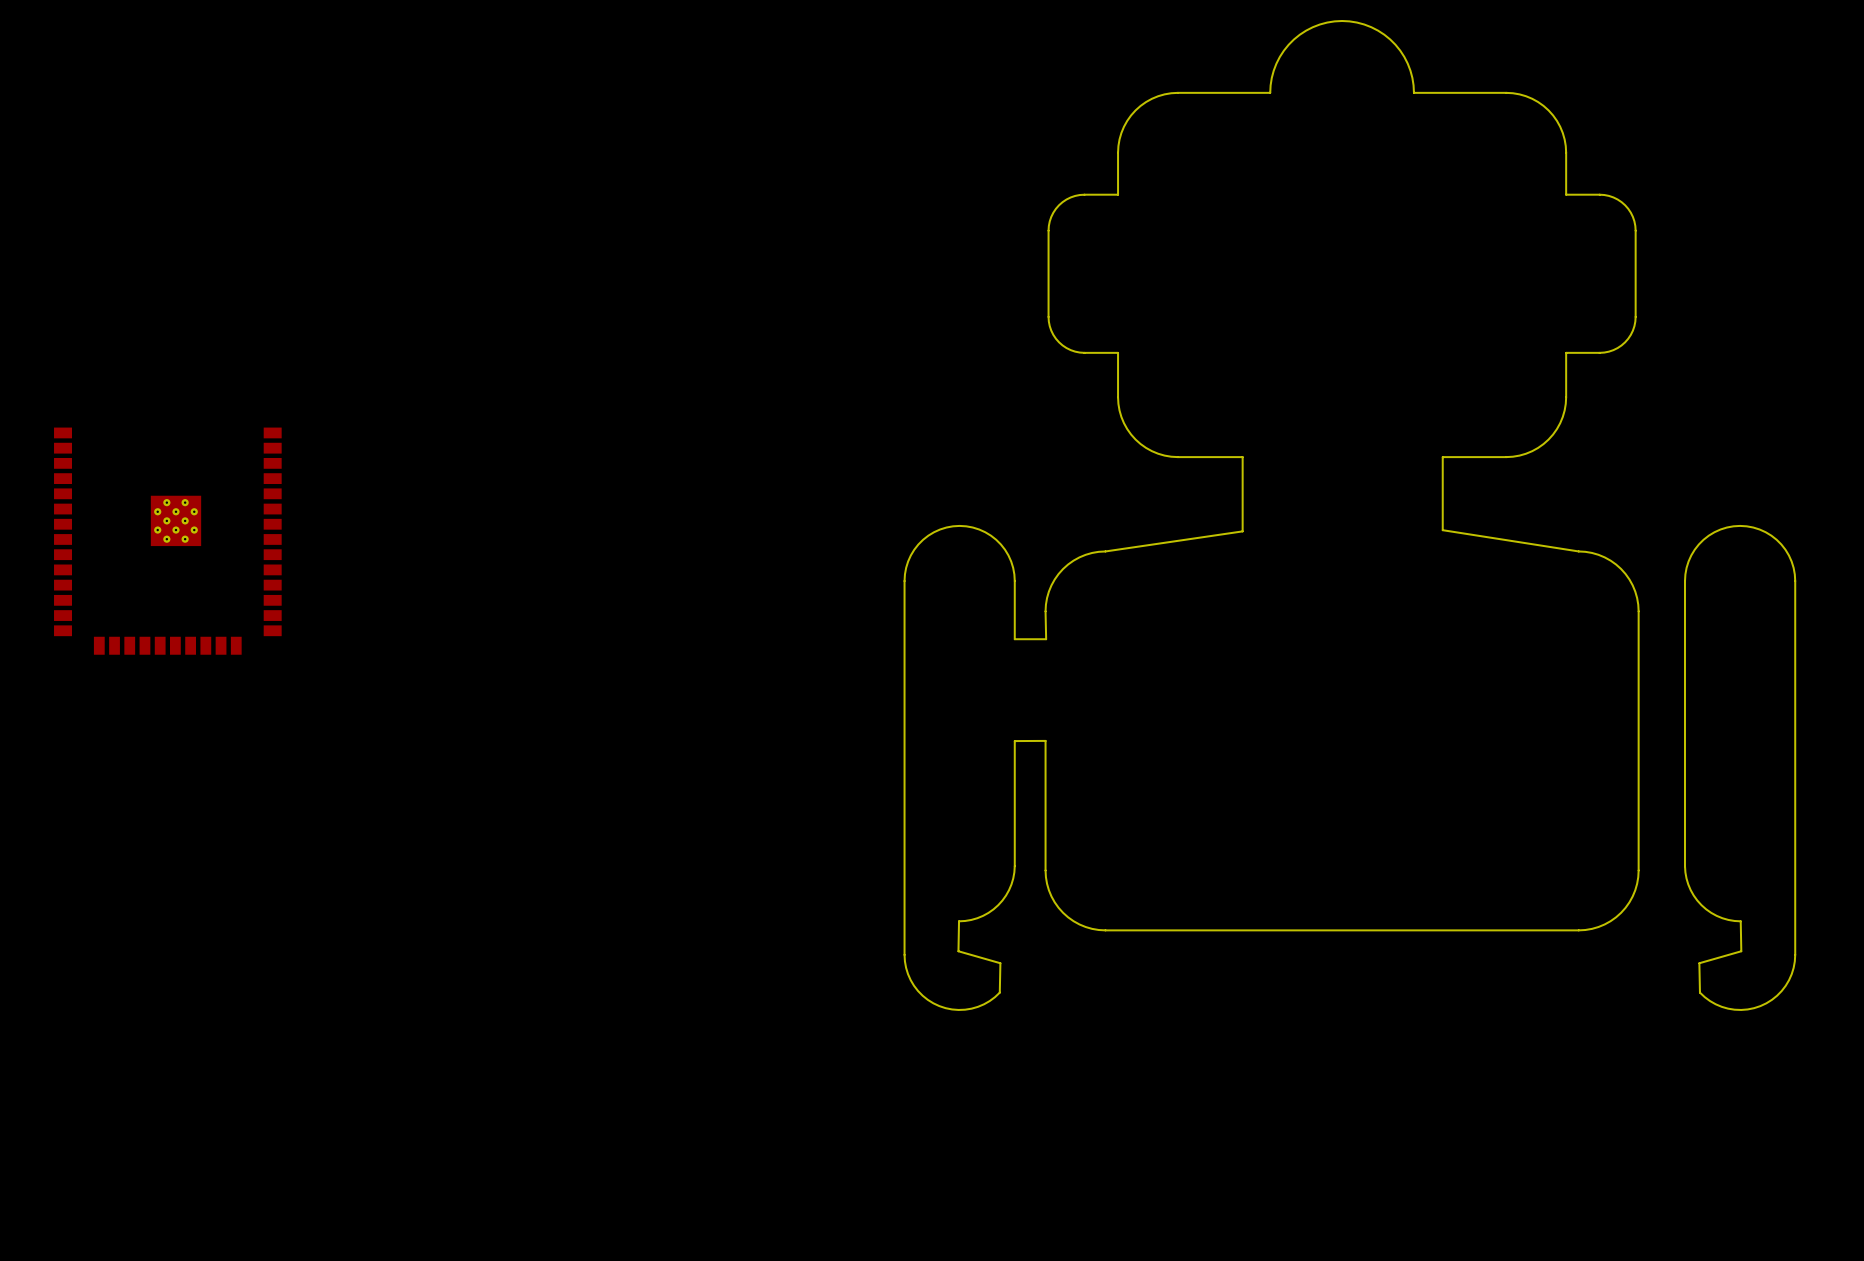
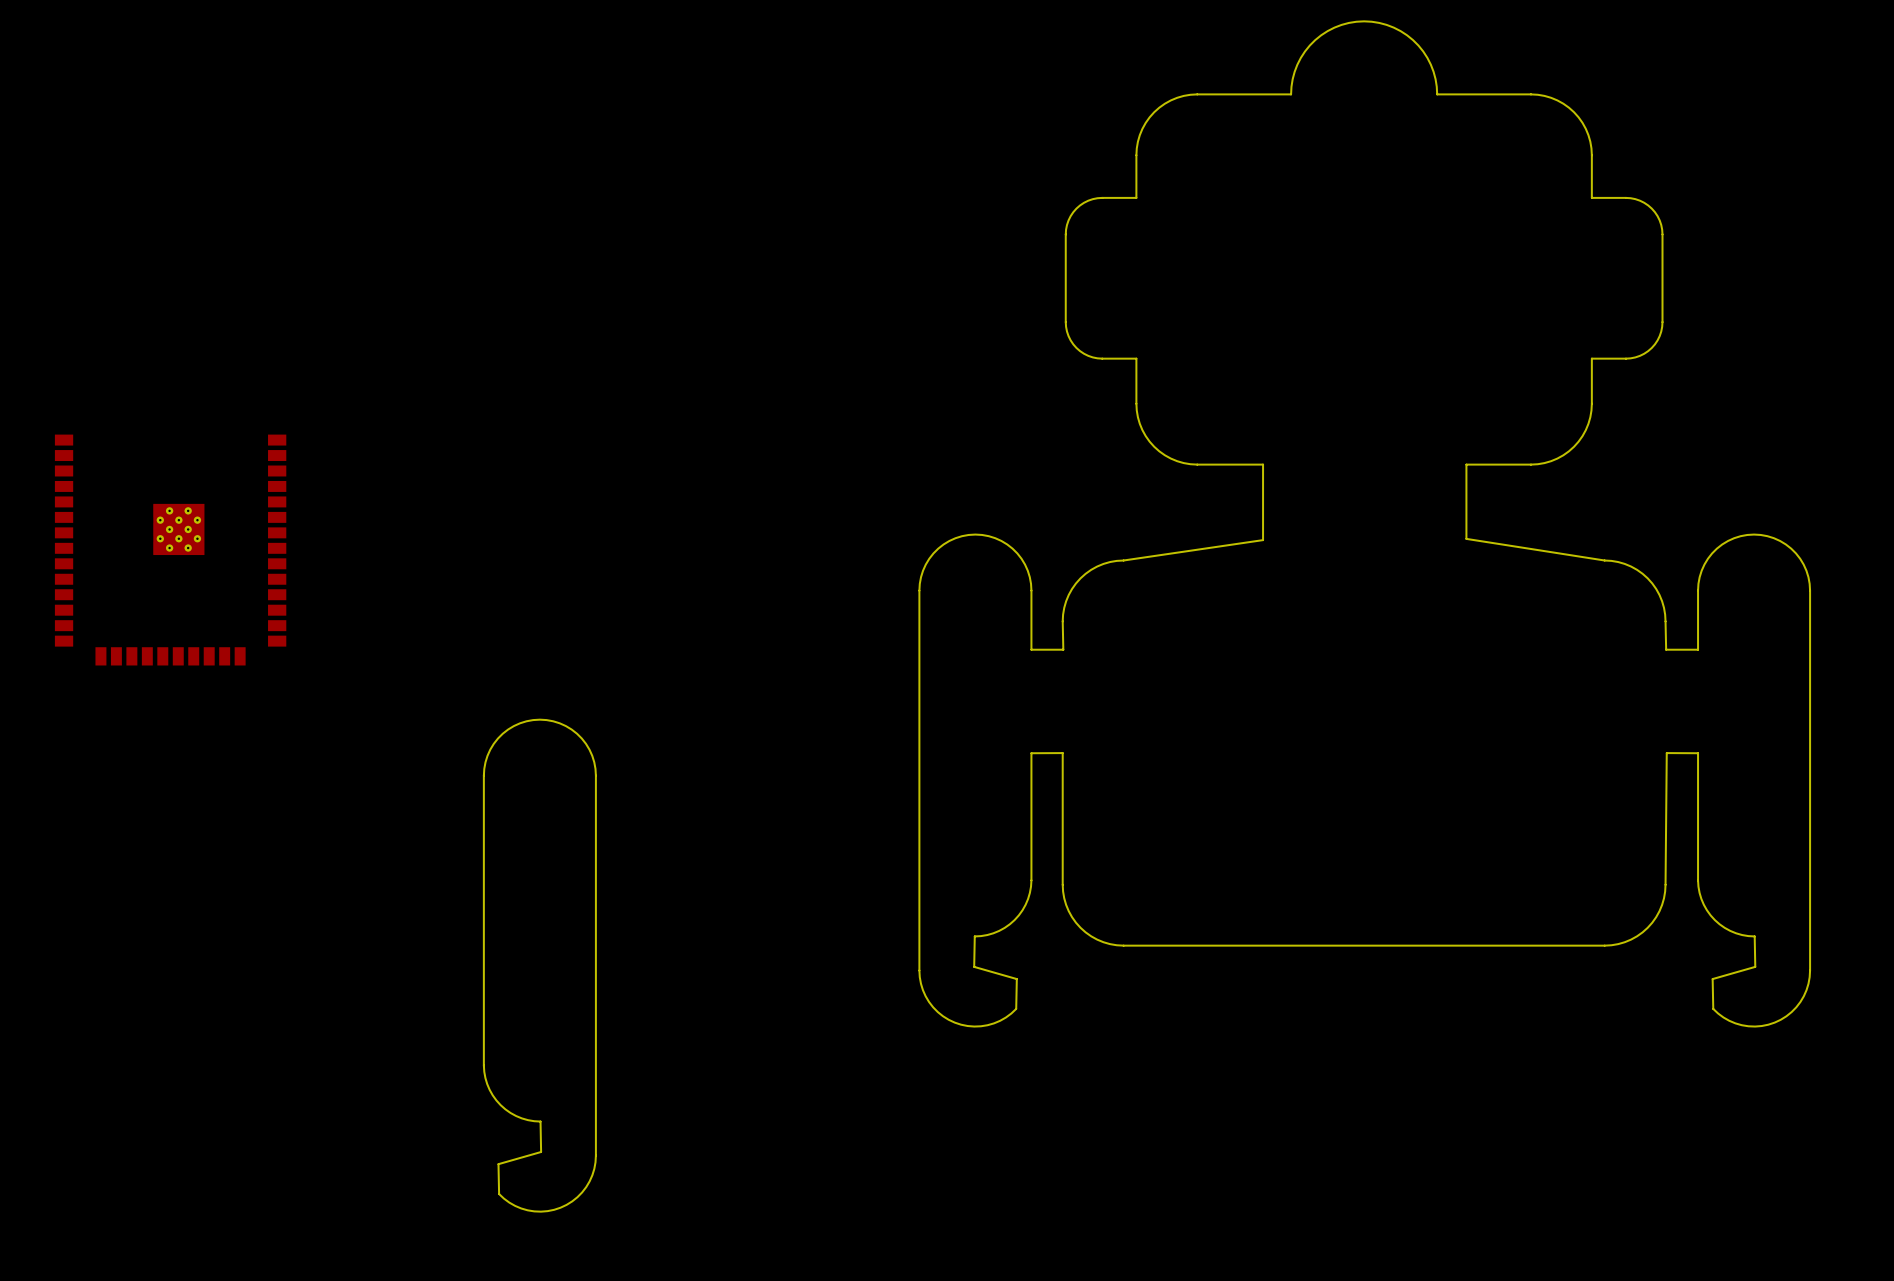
board edge: (1795, 581) (1794, 961) (1789, 980) (1781, 991) (1771, 999) (1754, 1008) (1734, 1009) (1715, 1004) (1699, 992) (1699, 963) (1741, 951) (1740, 921) (1722, 918) (1701, 905) (1690, 890) (1685, 872) (1685, 574) (1691, 555) (1703, 539) (1720, 529) (1733, 526) (1746, 526) (1765, 532) (1781, 544) (1791, 561) (1795, 581) -> none
board edge: (1638, 611) (1638, 870) -> (1665, 621) (1666, 649) (1698, 649) (1698, 590) (1701, 570) (1712, 553) (1722, 544) (1734, 538) (1754, 534) (1773, 538) (1791, 548) (1800, 558) (1806, 570) (1810, 590) (1810, 970) (1806, 990) (1796, 1007) (1786, 1016) (1774, 1022) (1755, 1026) (1735, 1023) (1723, 1017) (1713, 1008) (1712, 979) (1755, 966) (1754, 936) (1736, 933) (1719, 924) (1706, 910) (1701, 898) (1698, 880) (1698, 753) (1666, 753) (1665, 884)
board edge: none -> (595, 775) (595, 1162) (589, 1181) (577, 1197) (560, 1207) (547, 1211) (534, 1211) (515, 1205) (499, 1194) (498, 1164) (541, 1151) (540, 1121) (516, 1116) (500, 1105) (489, 1089) (484, 1071) (484, 768) (490, 749) (502, 733) (513, 726) (526, 721) (546, 720) (565, 726) (581, 738) (592, 755) (595, 775)

